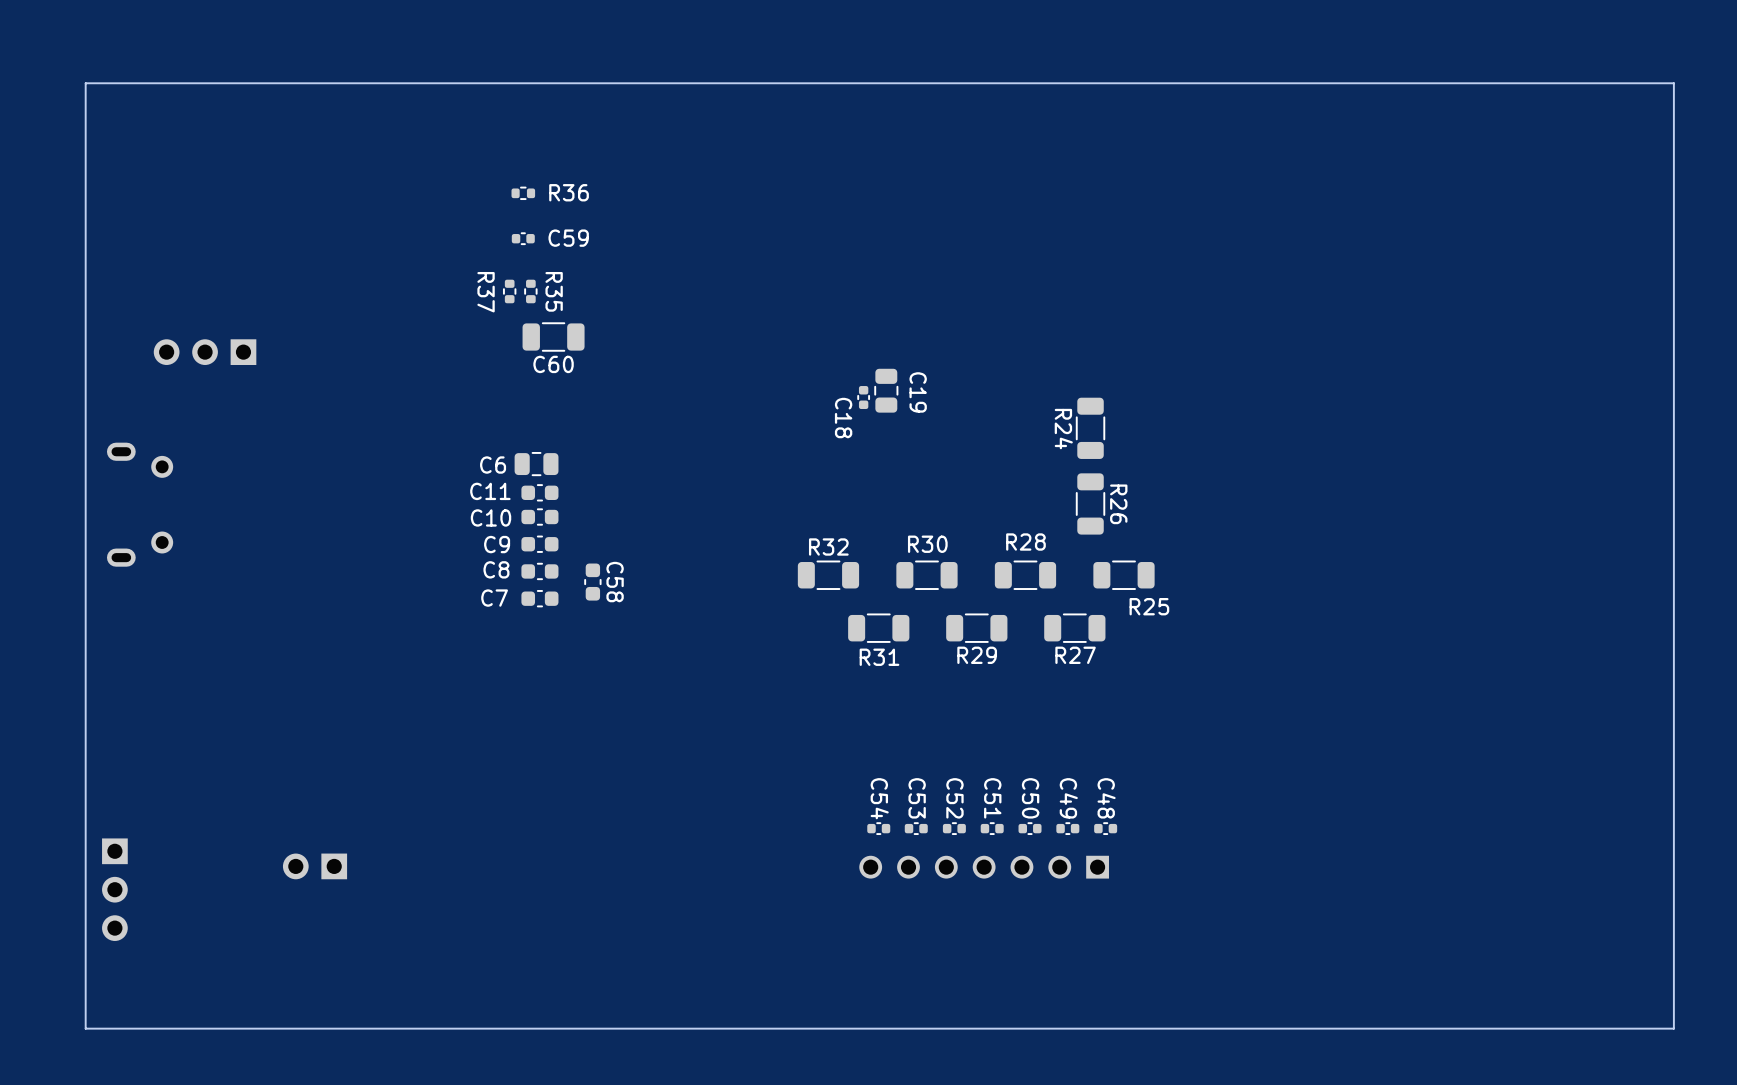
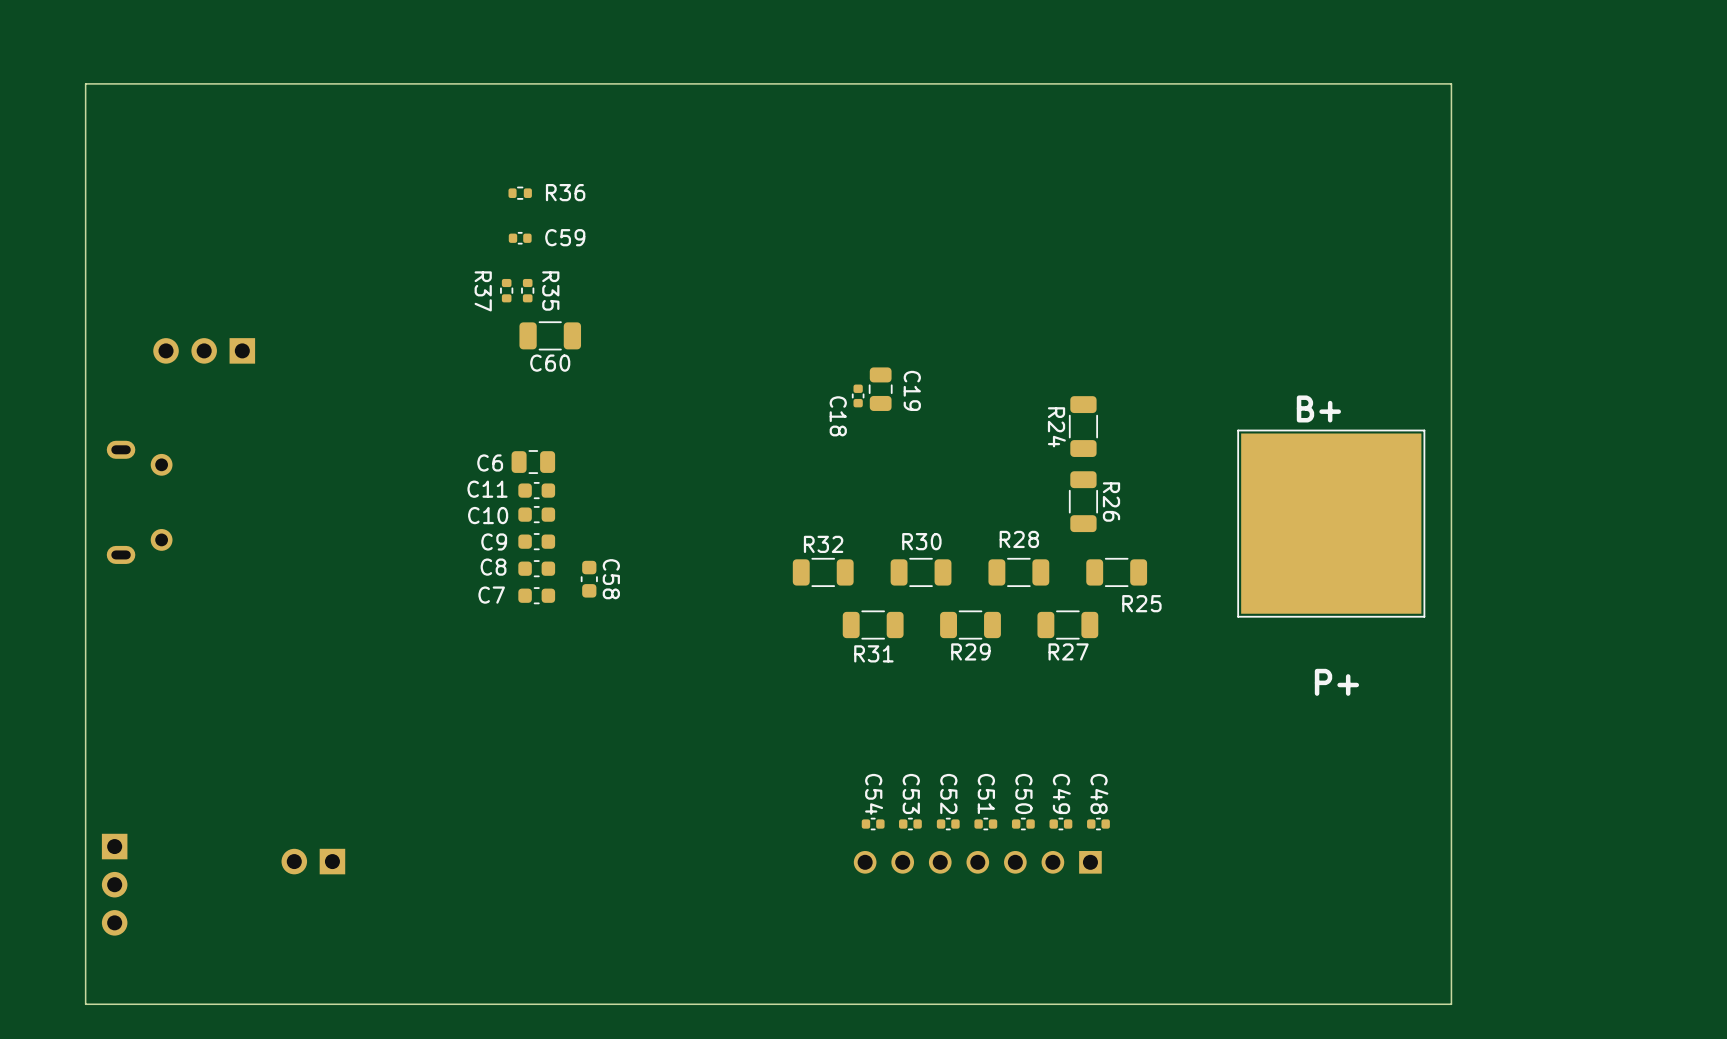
board edge: (1461, 83) (1673, 83) (1673, 1028) (85, 1028) (85, 1010) -> (1451, 83) (1451, 1004) (85, 1004)
text: none -> B+ (1318, 408)
part: none -> (1331, 523)
text: none -> P+ (1336, 682)

